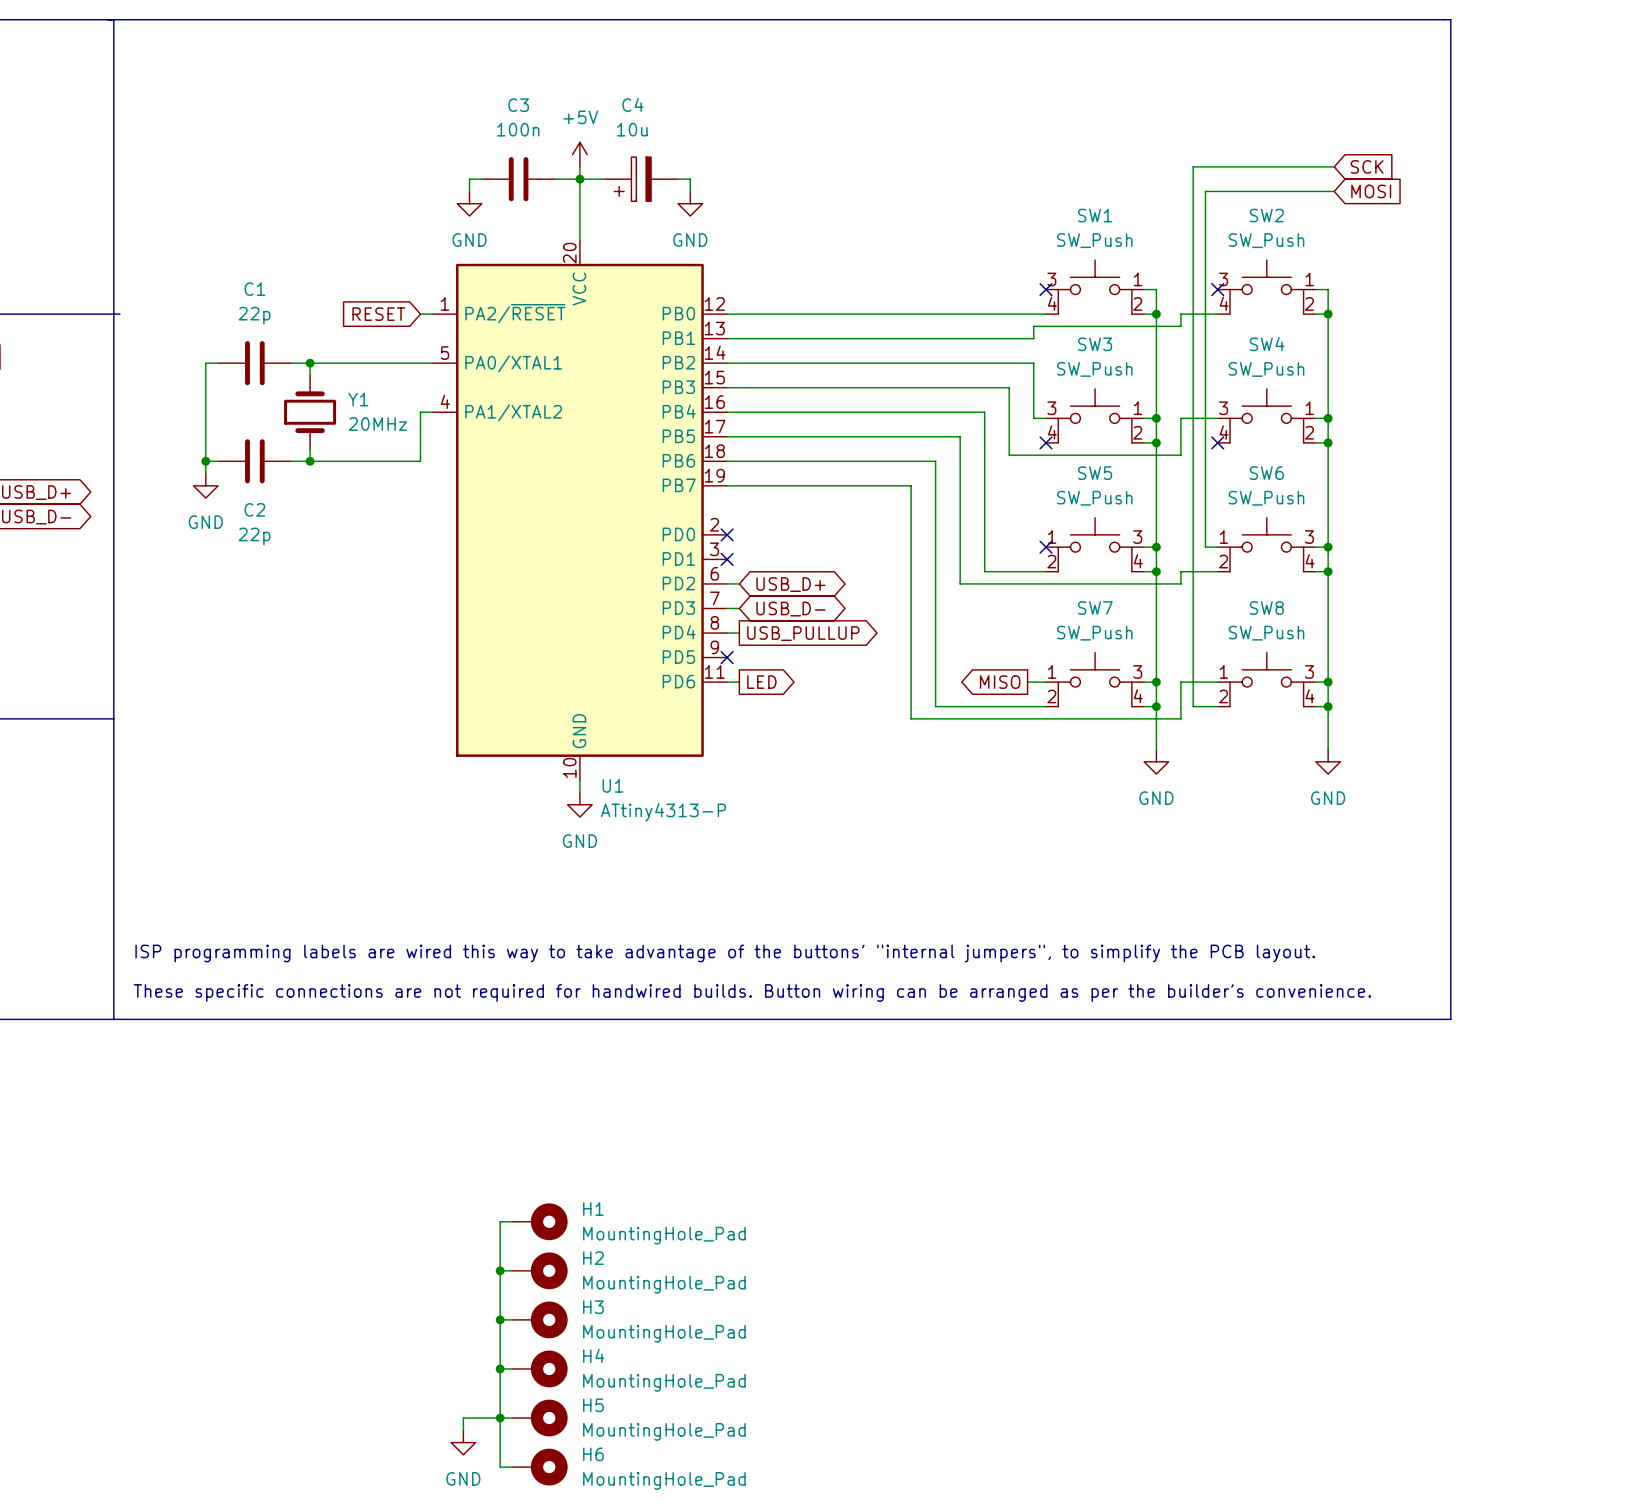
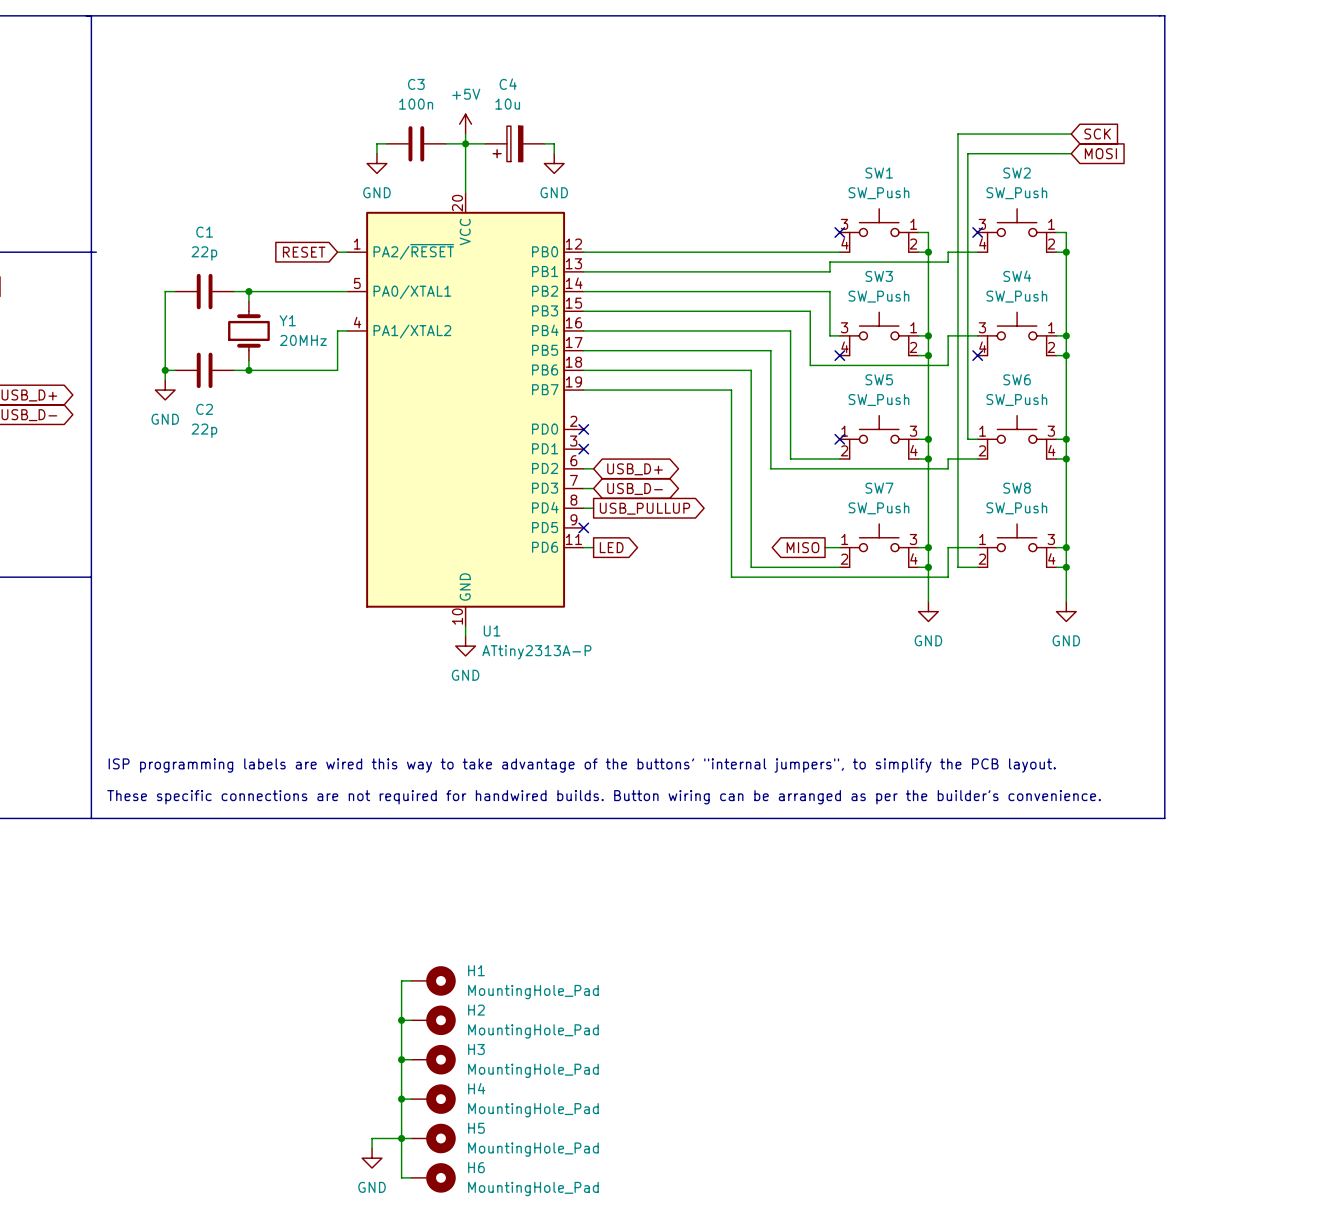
U1 value: ATtiny4313-P (663, 812) -> ATtiny2313A-P (536, 652)

